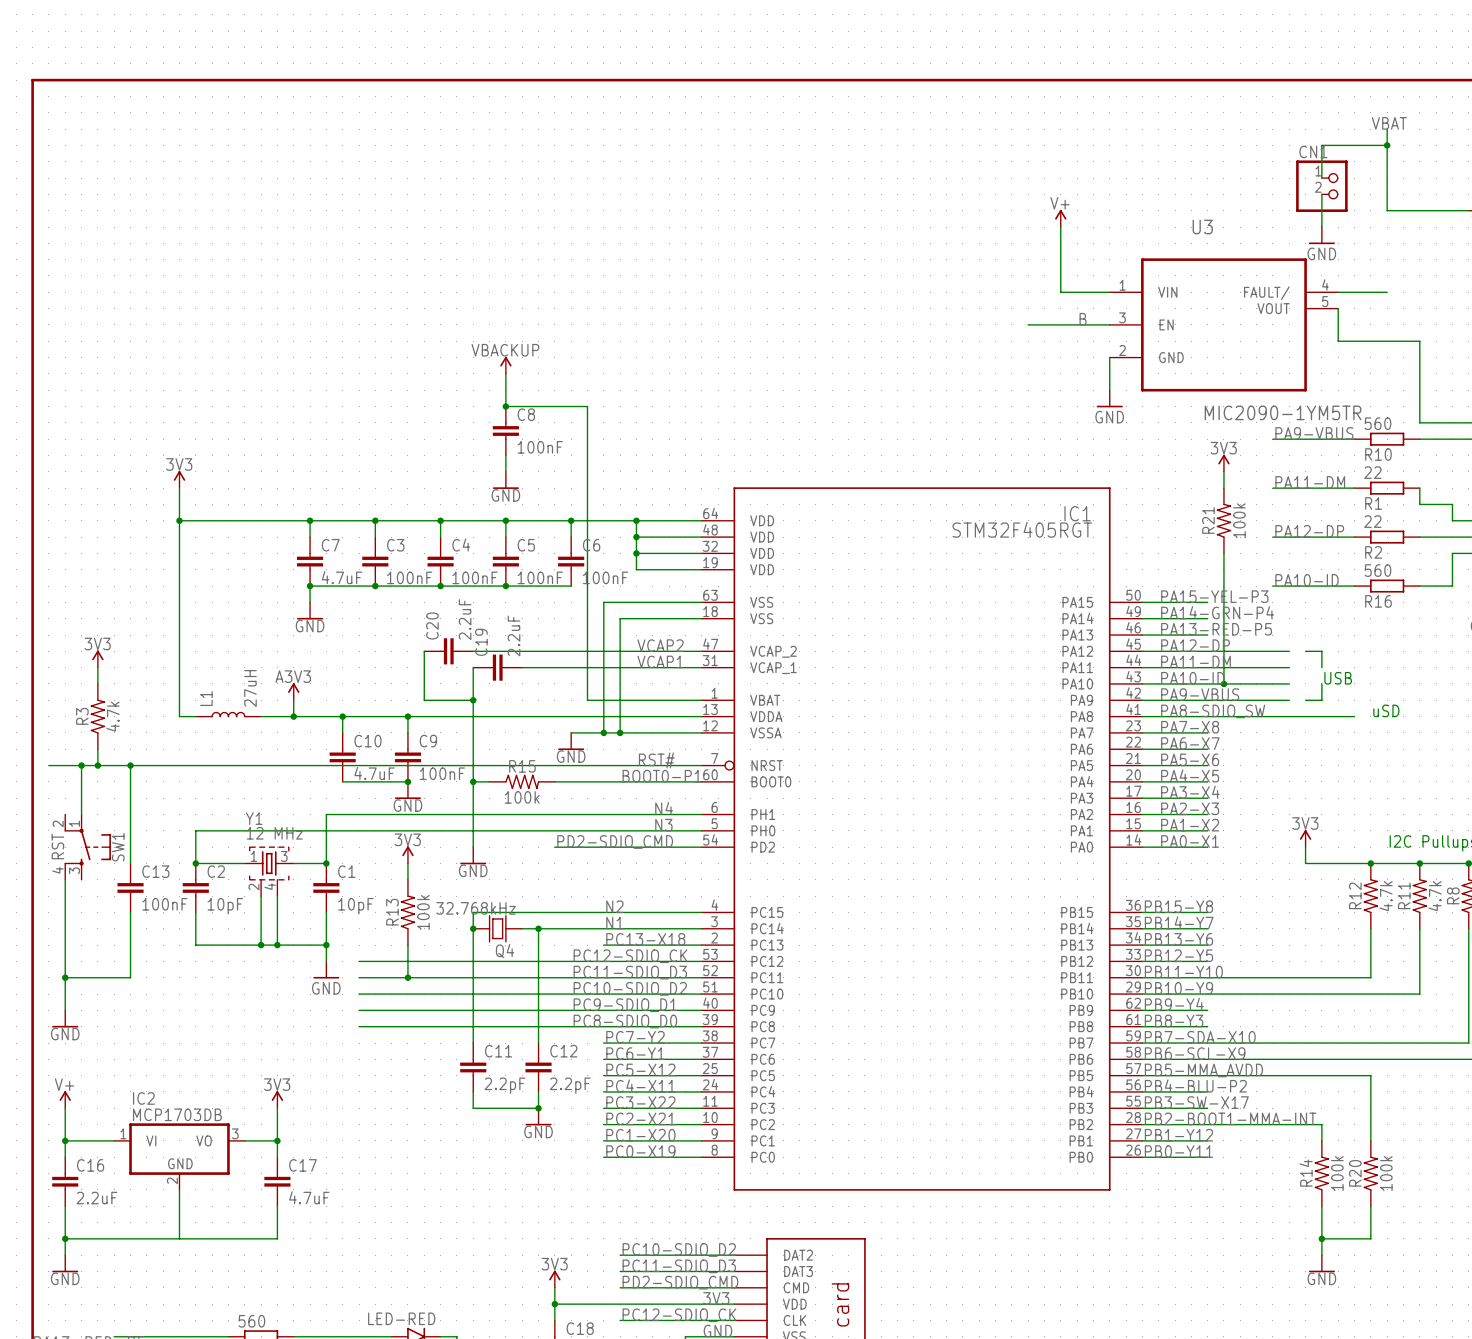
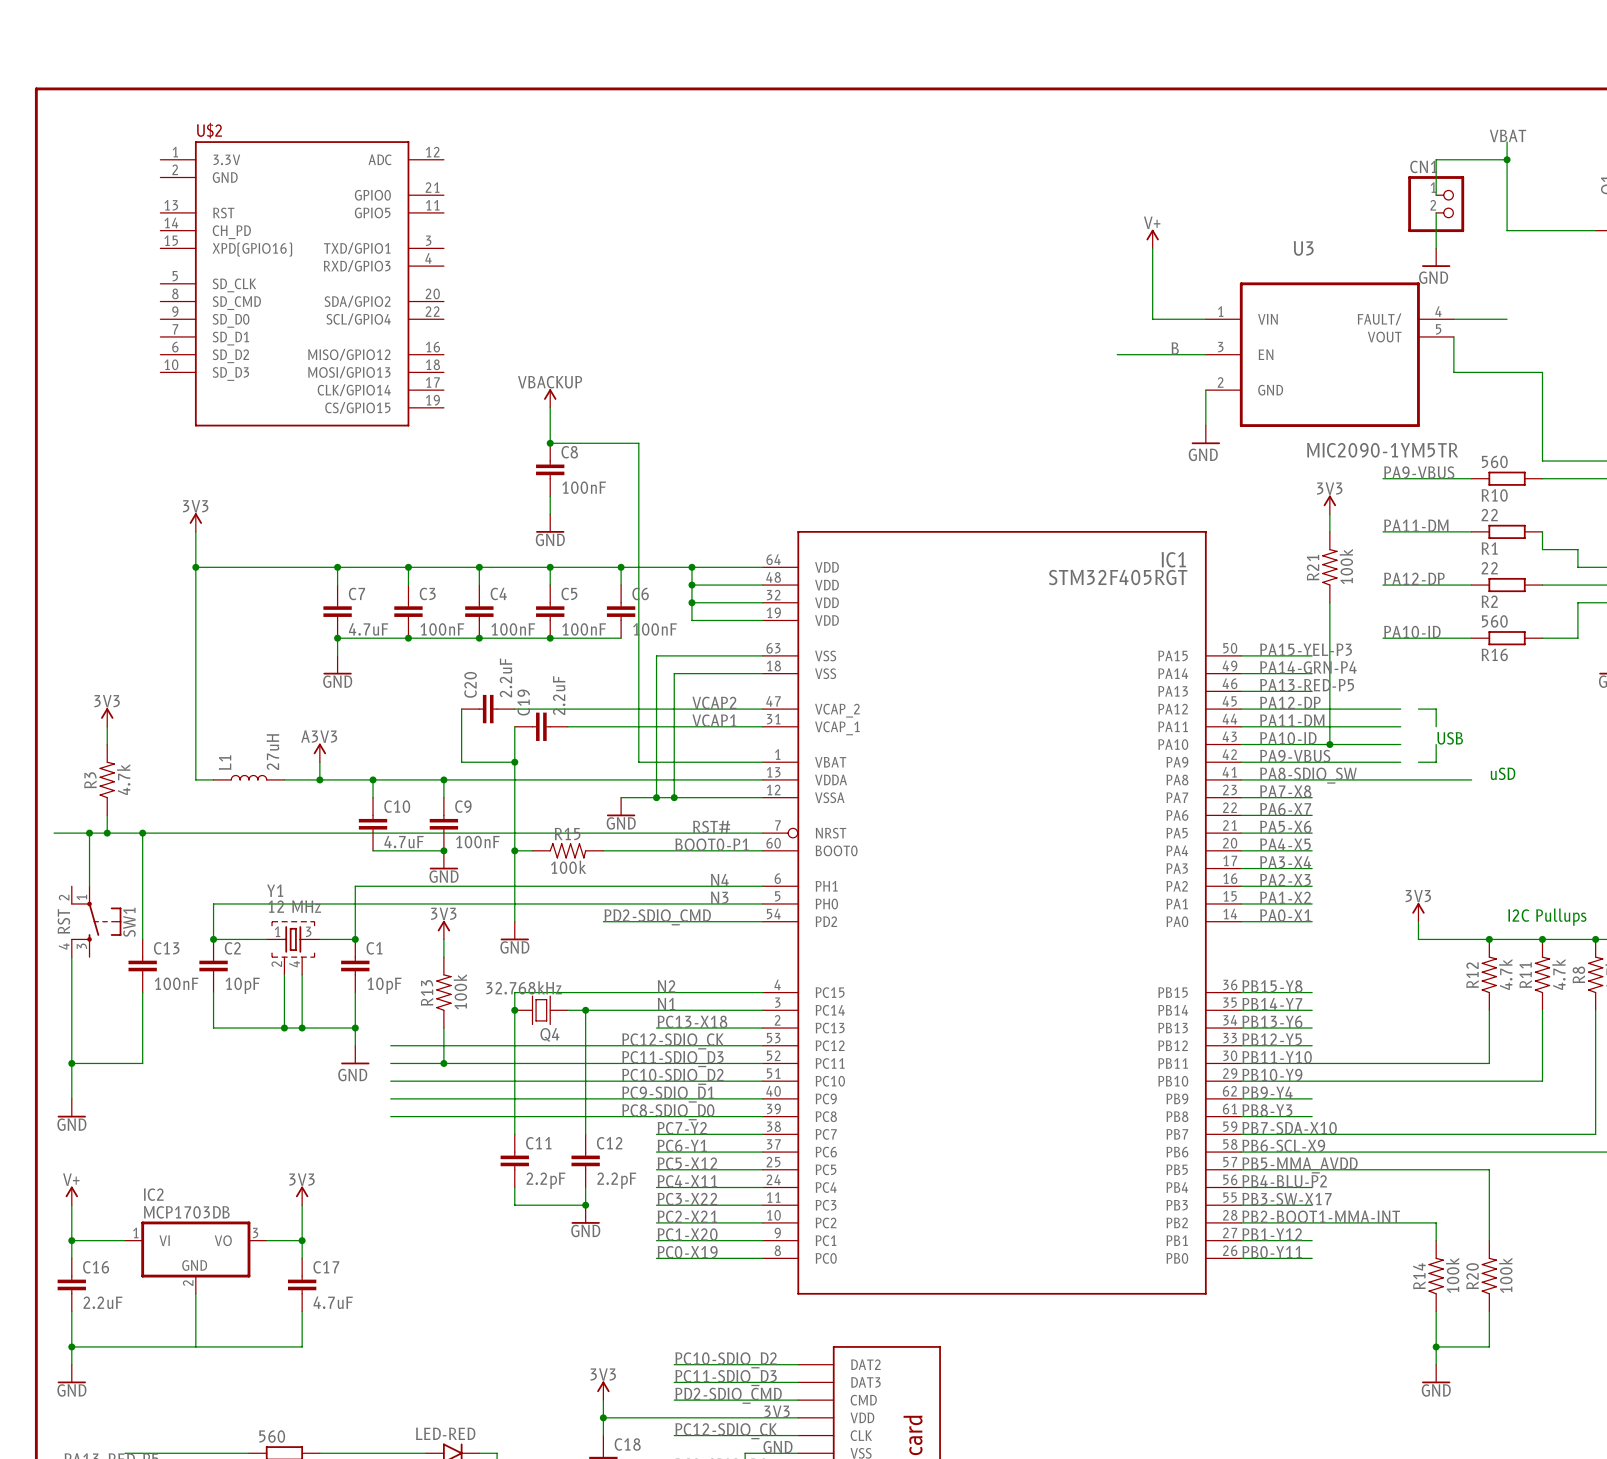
U$2: none -> (302, 283)

